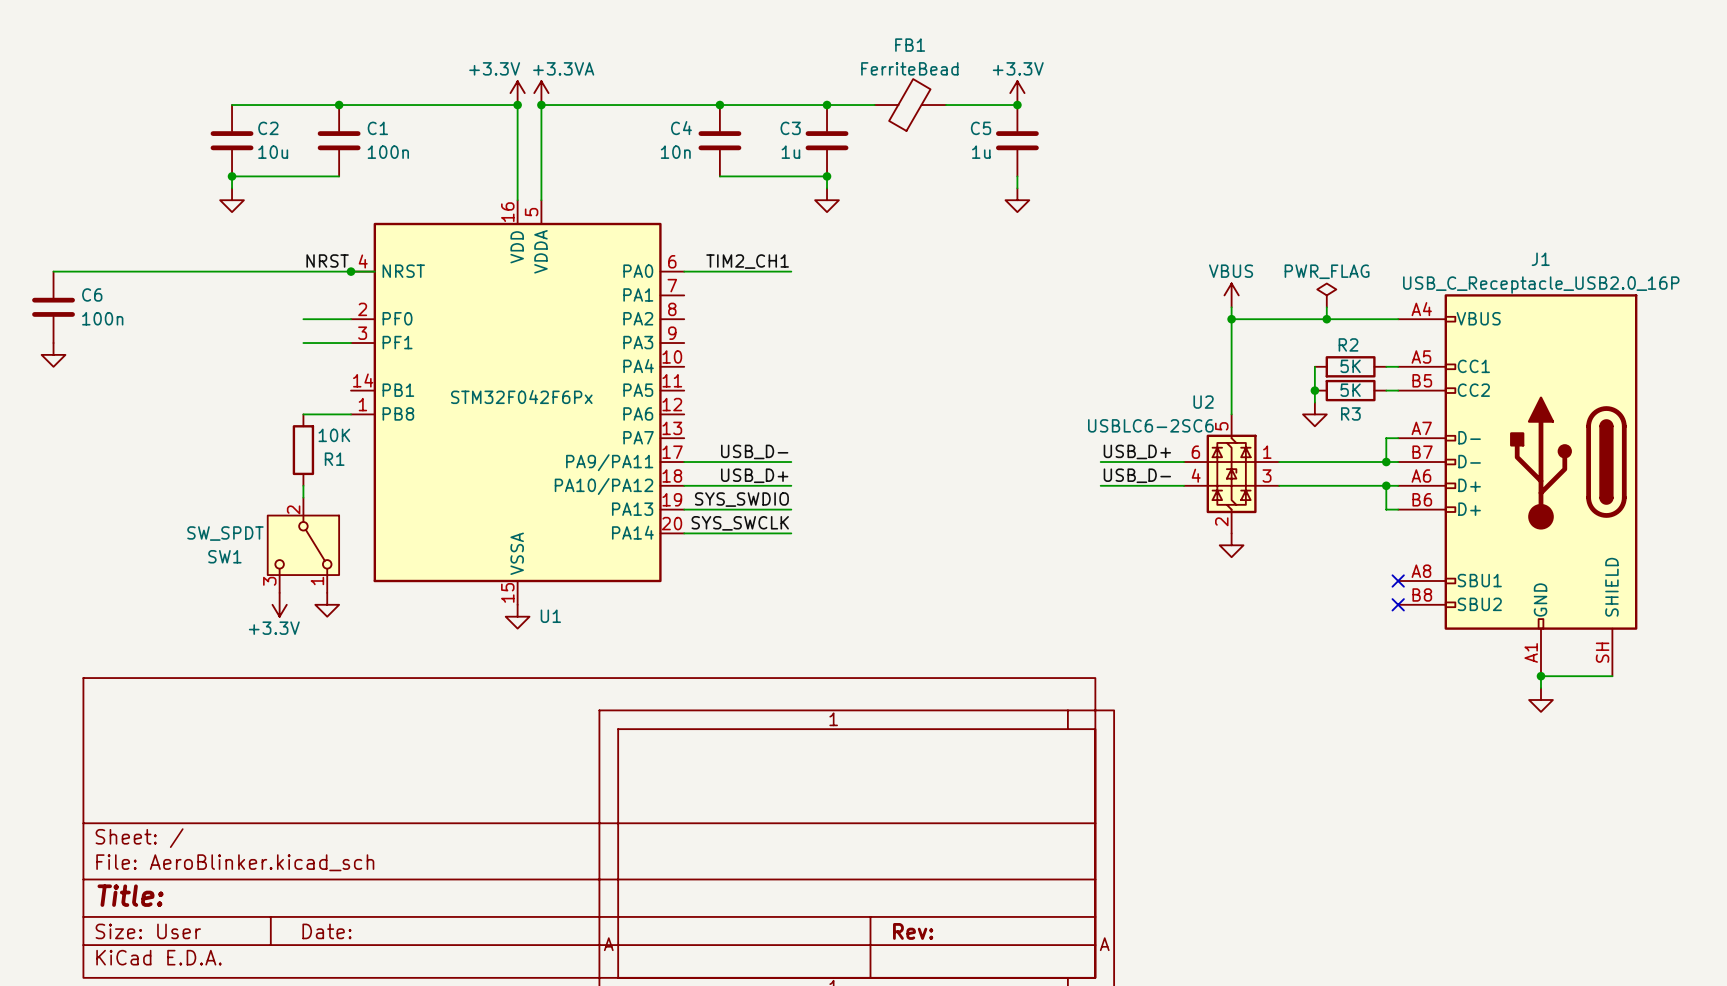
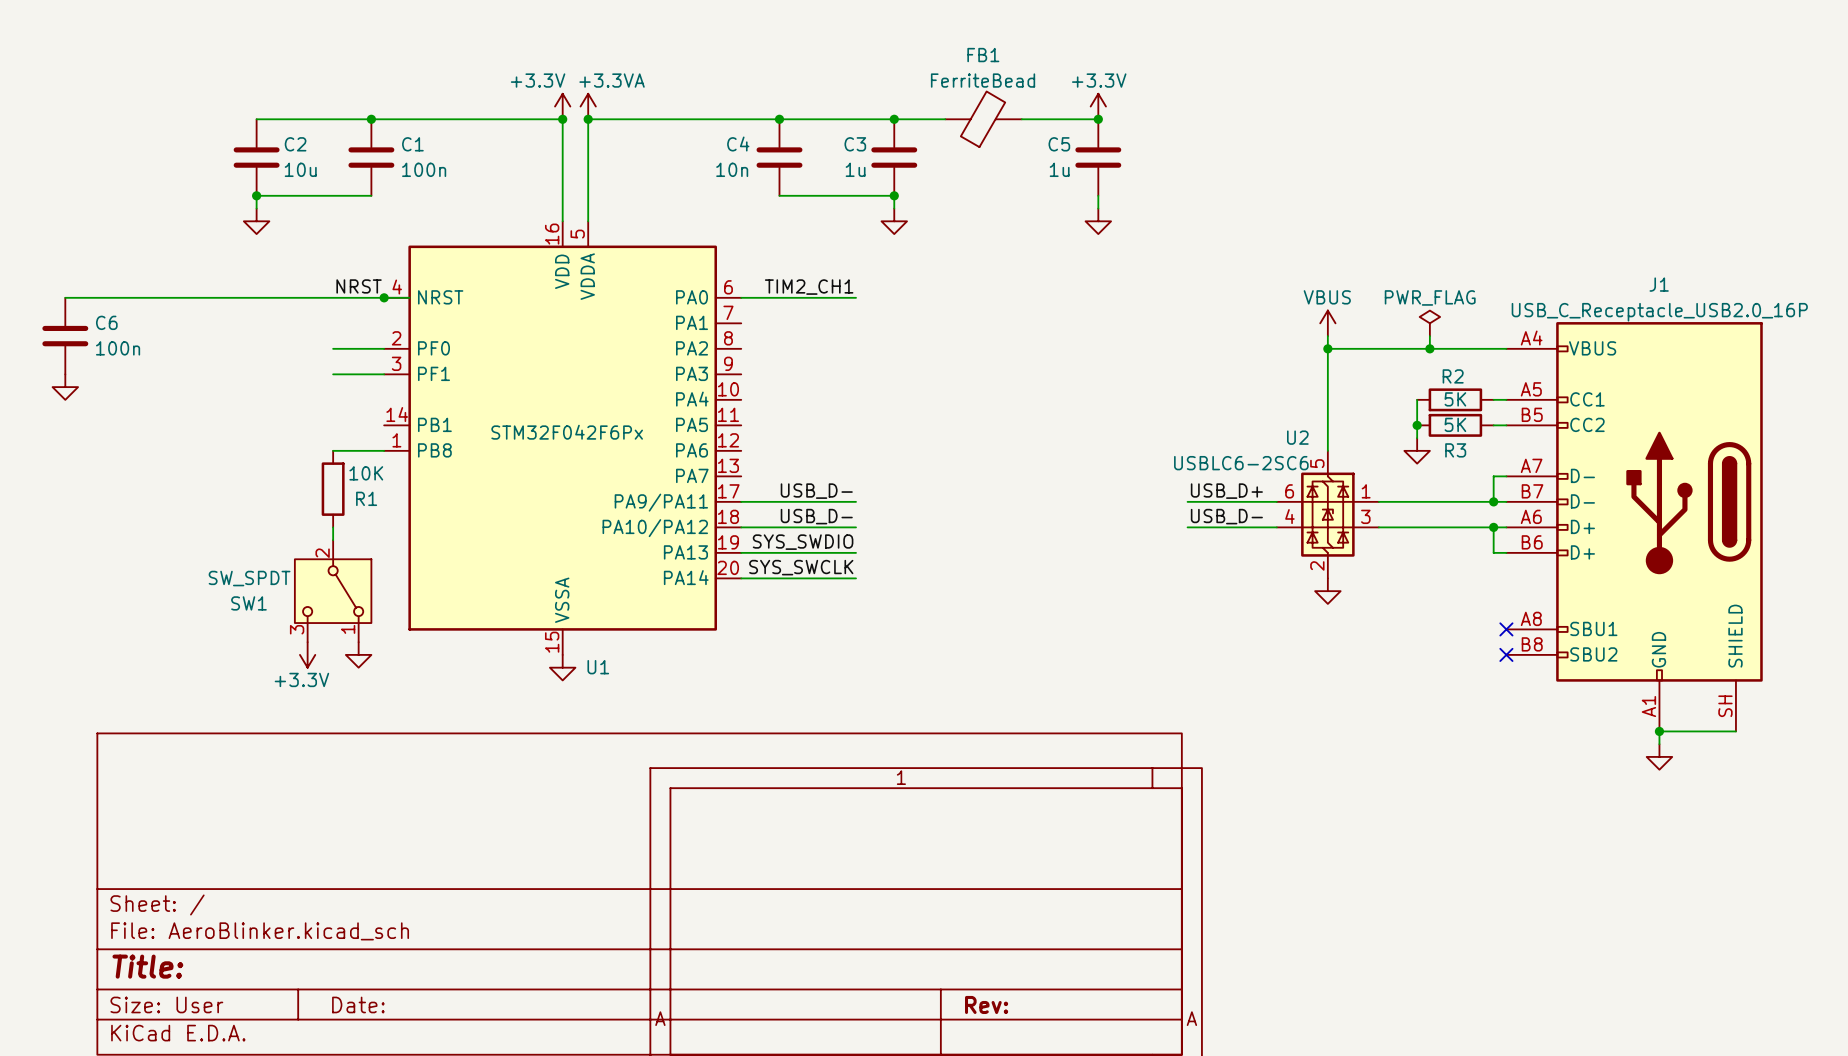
label: USB_D+ (754, 475) -> USB_D- (816, 516)

